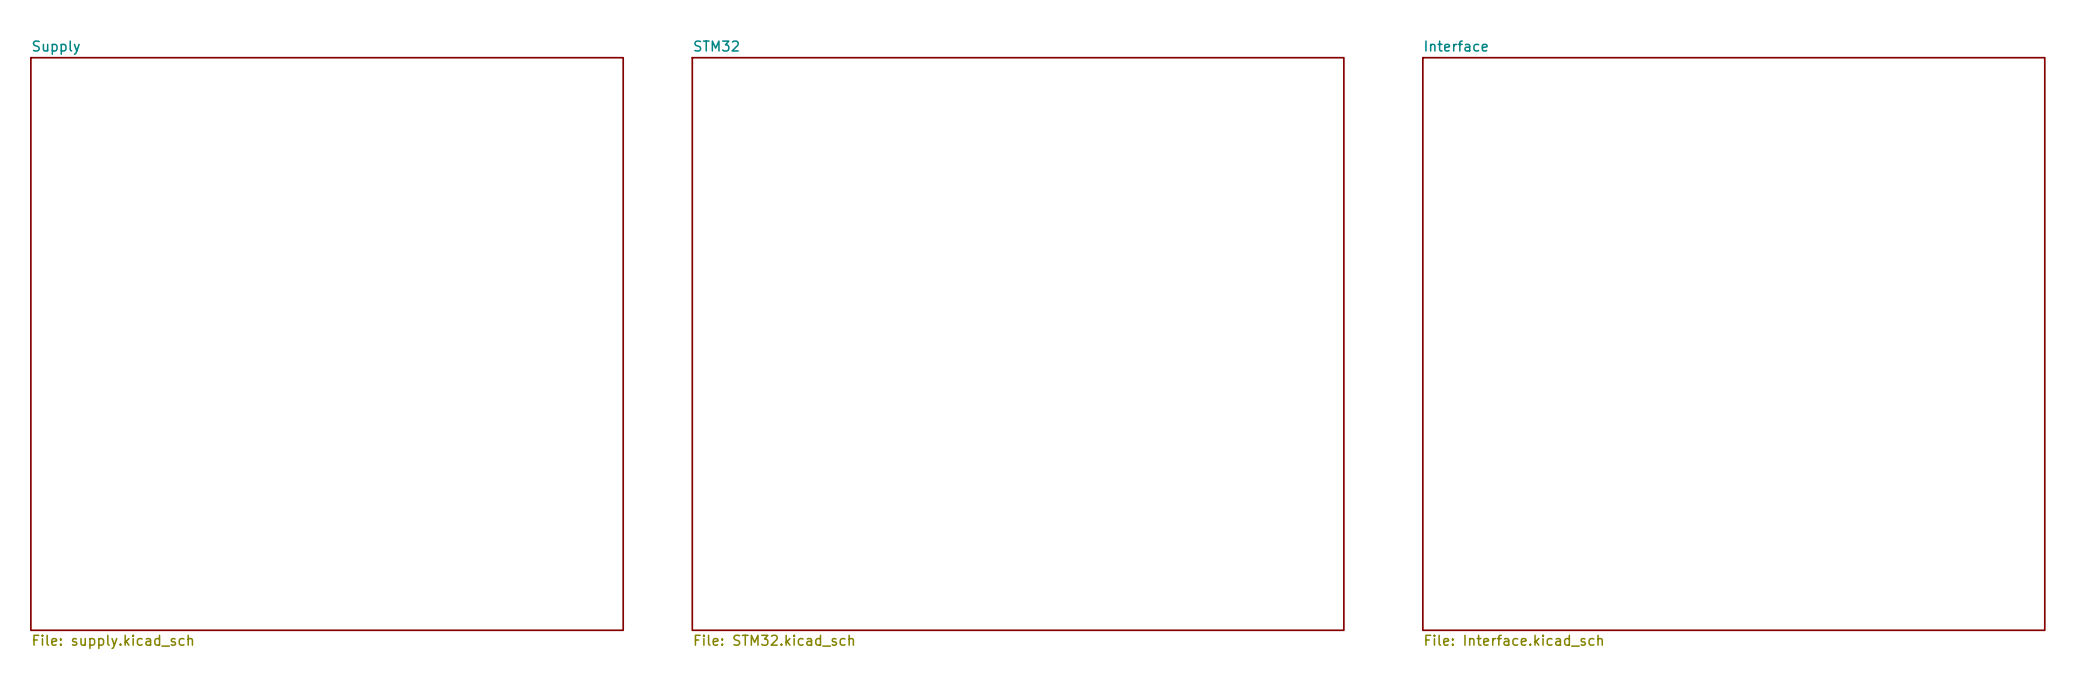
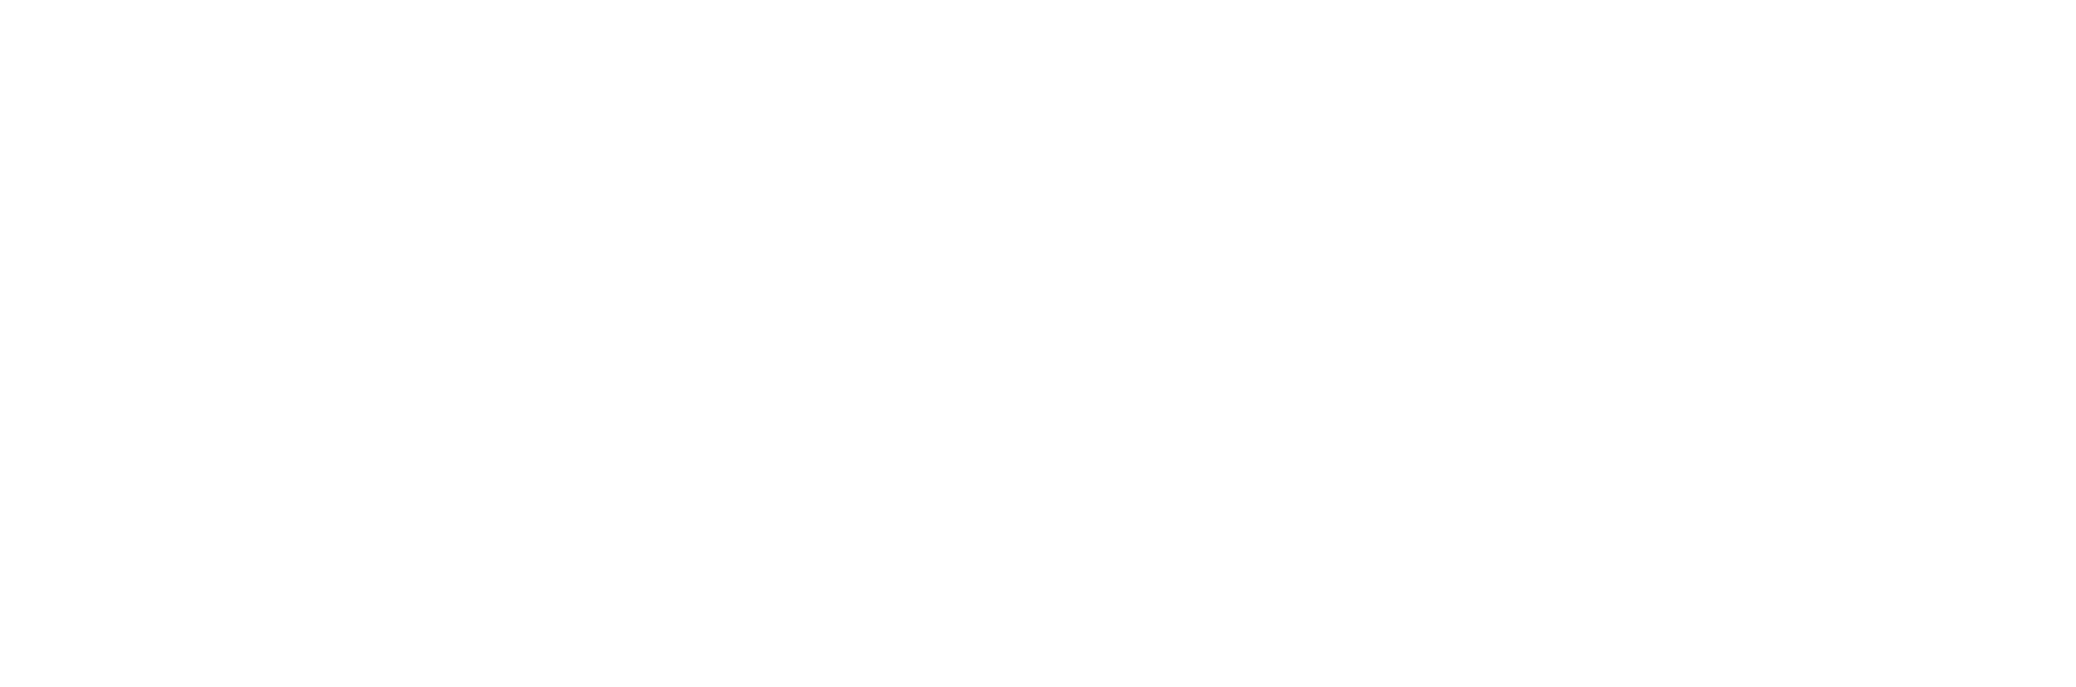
sheet Supply: File: supply.kicad_sch (327, 343) -> none
sheet STM32: File: STM32.kicad_sch (1018, 343) -> none
sheet Interface: File: Interface.kicad_sch (1733, 343) -> none

